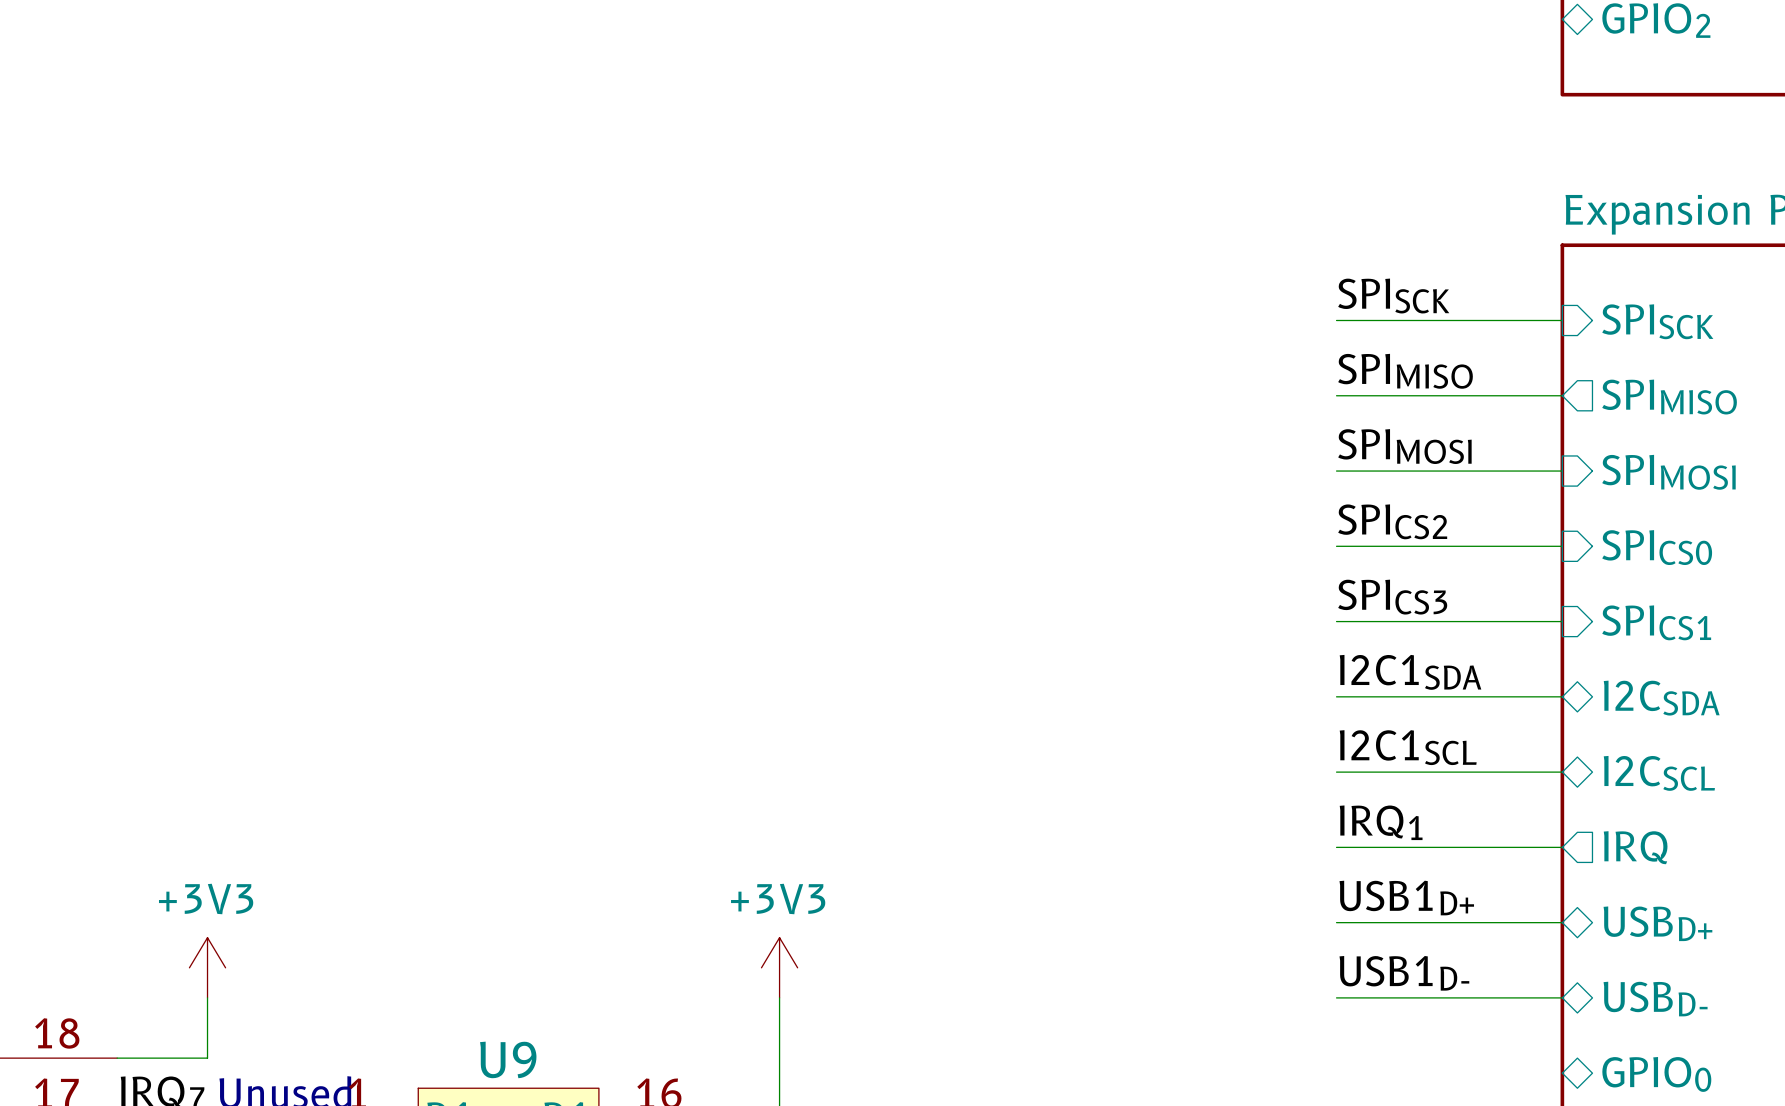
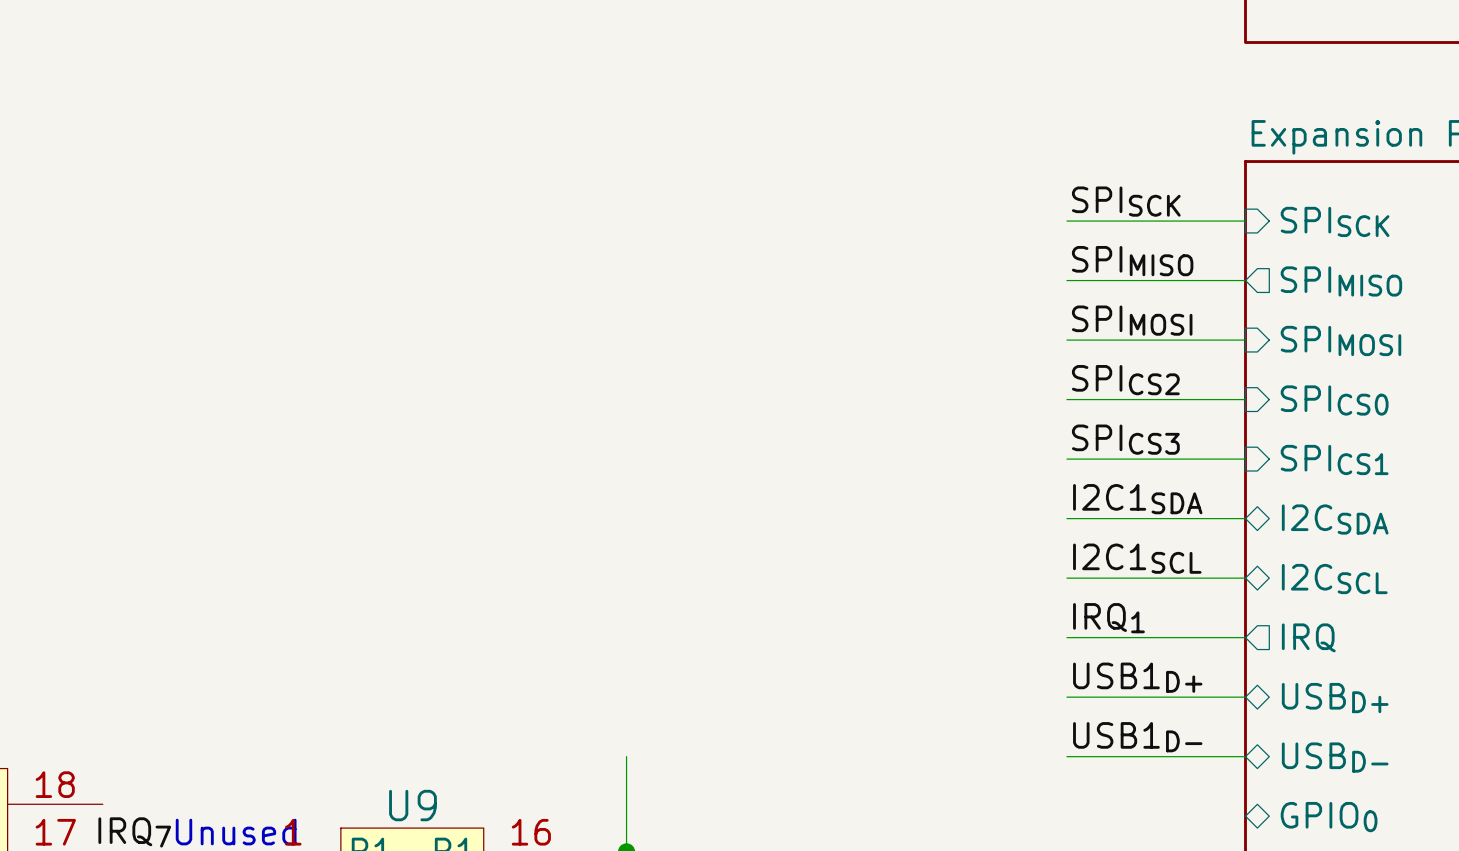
power symbol: +3V3 (207, 967) -> none
power symbol: +3V3 (779, 967) -> none
wire: (207, 997) (207, 1058) (117, 1058) -> none

